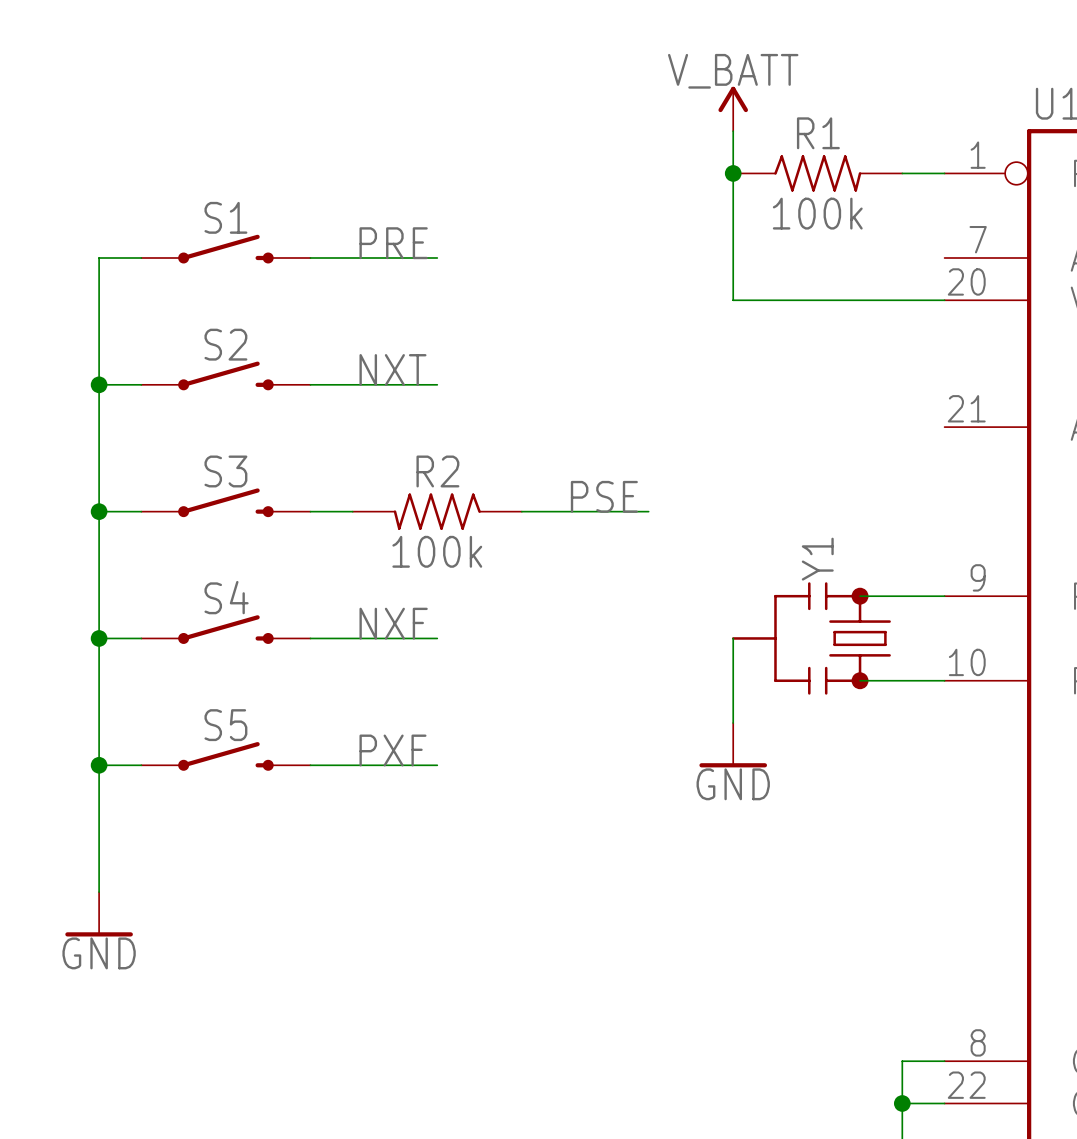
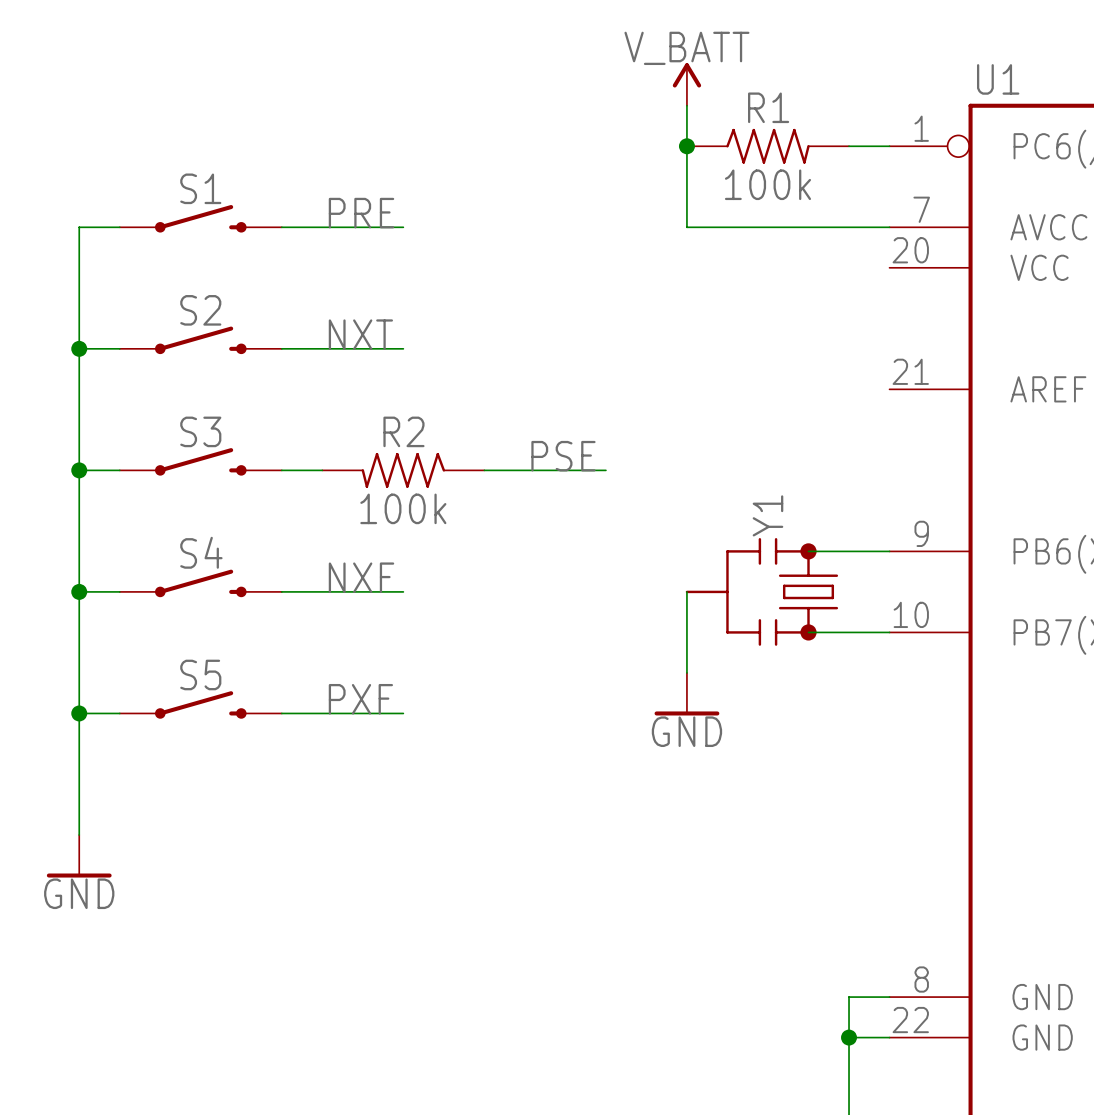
wire: (733, 257) (733, 300) (944, 300) -> (686, 227) (889, 227)

